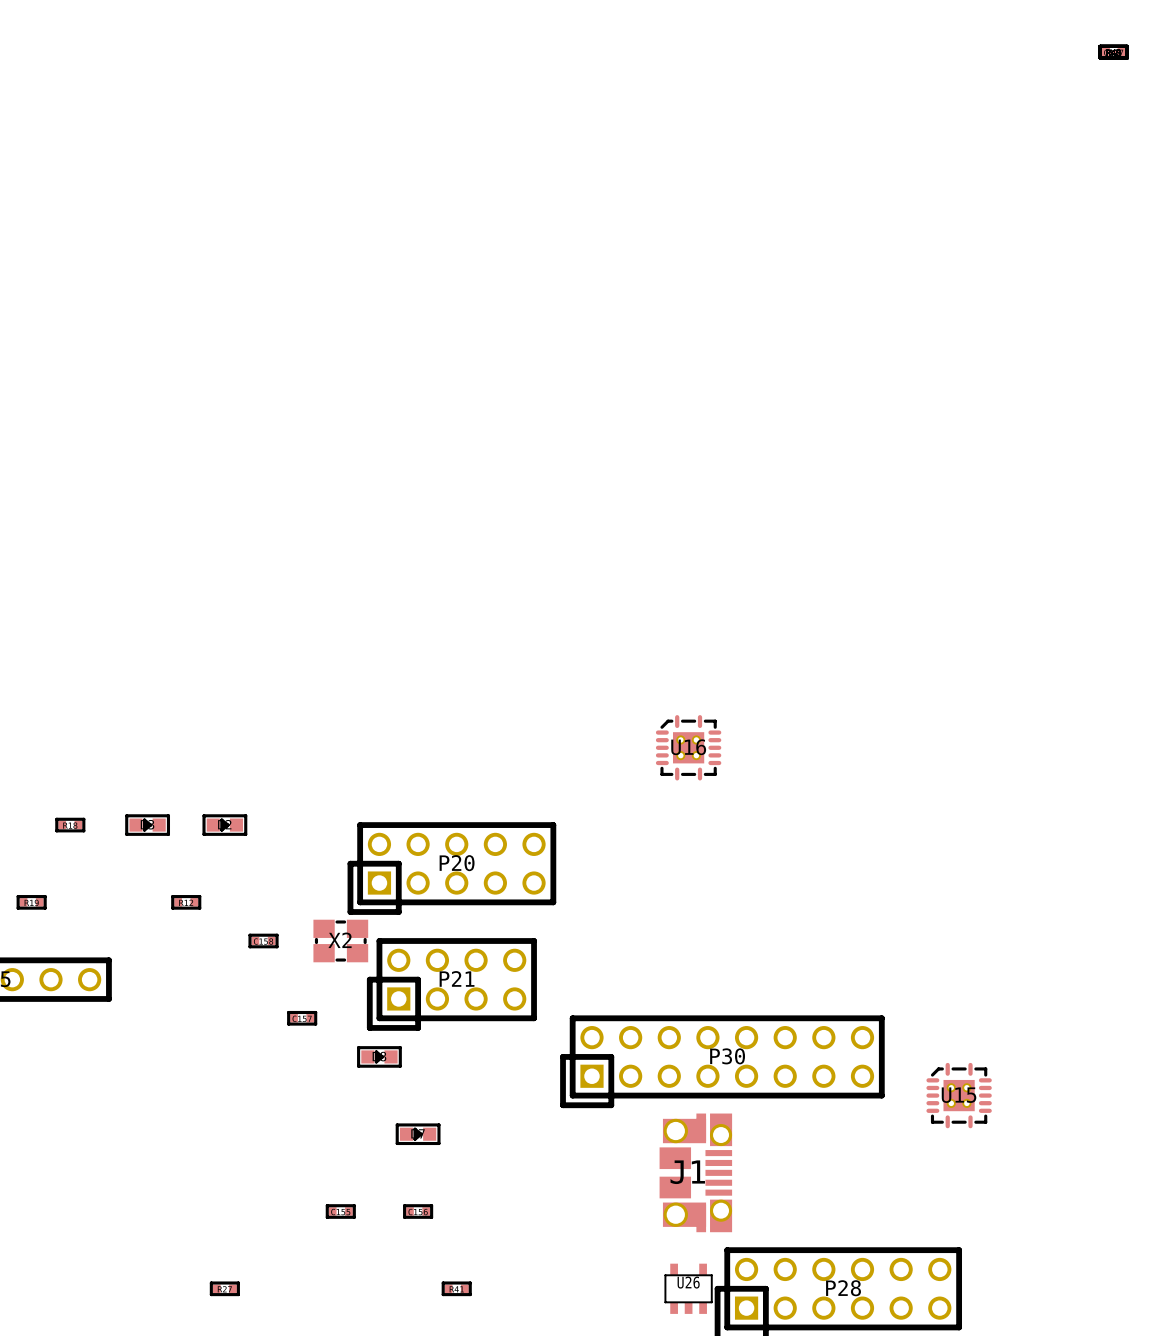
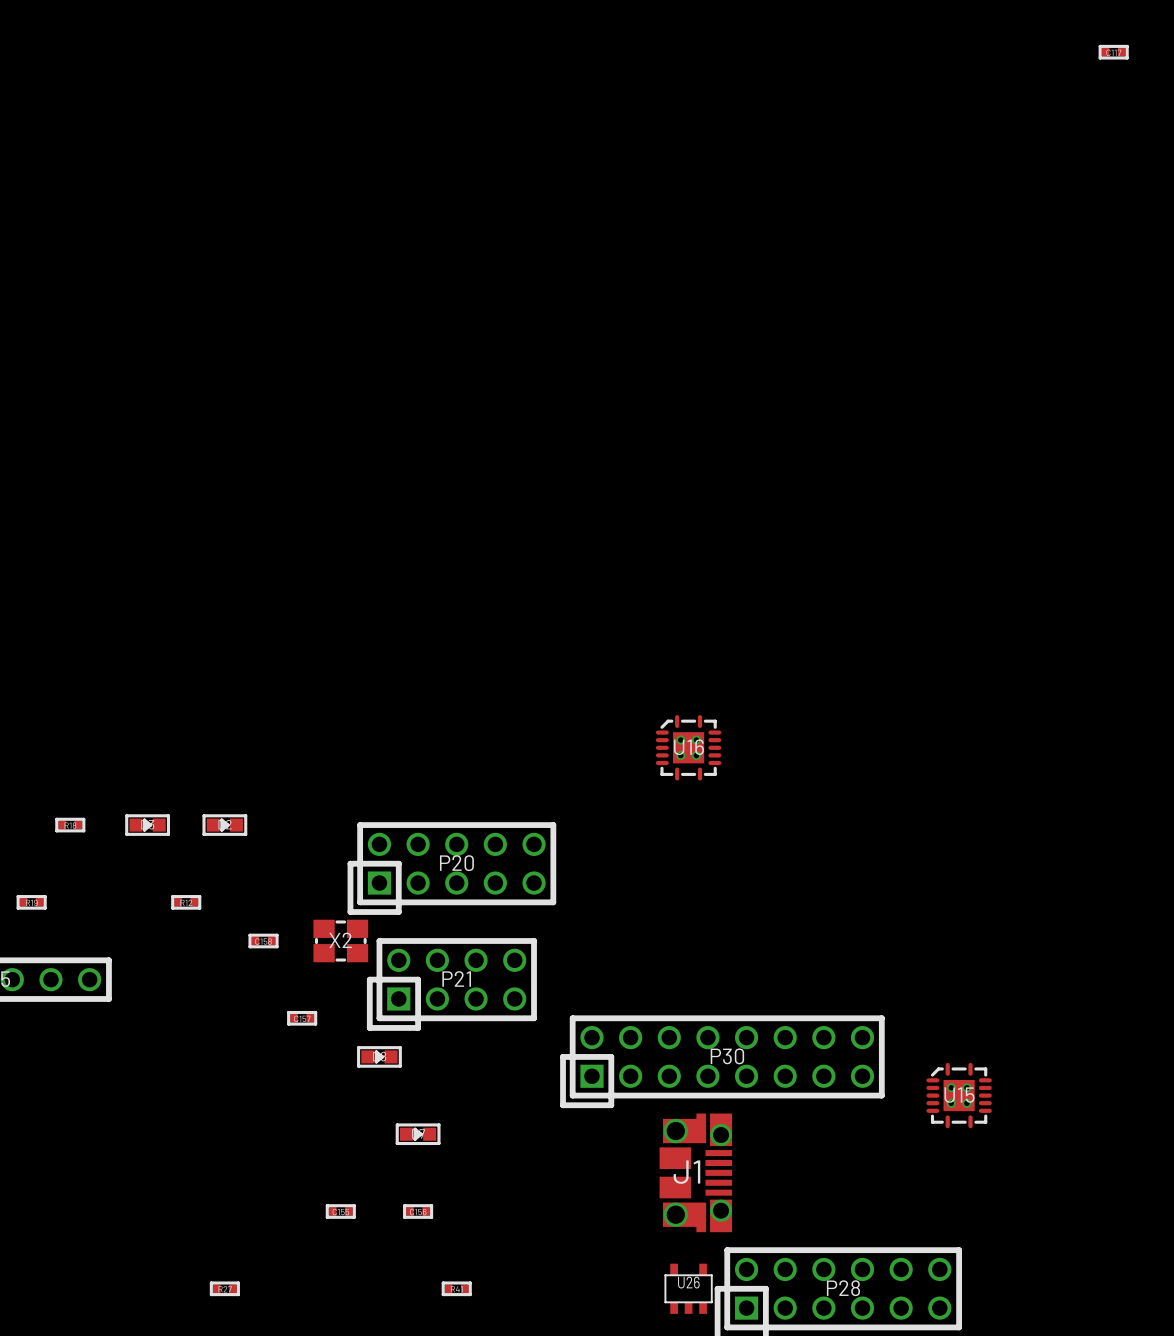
part: (1113, 52) -> none
part: (1113, 52) -> none
part: (1113, 52) -> none
part: (1113, 52) -> none
part: (1113, 52) -> none

